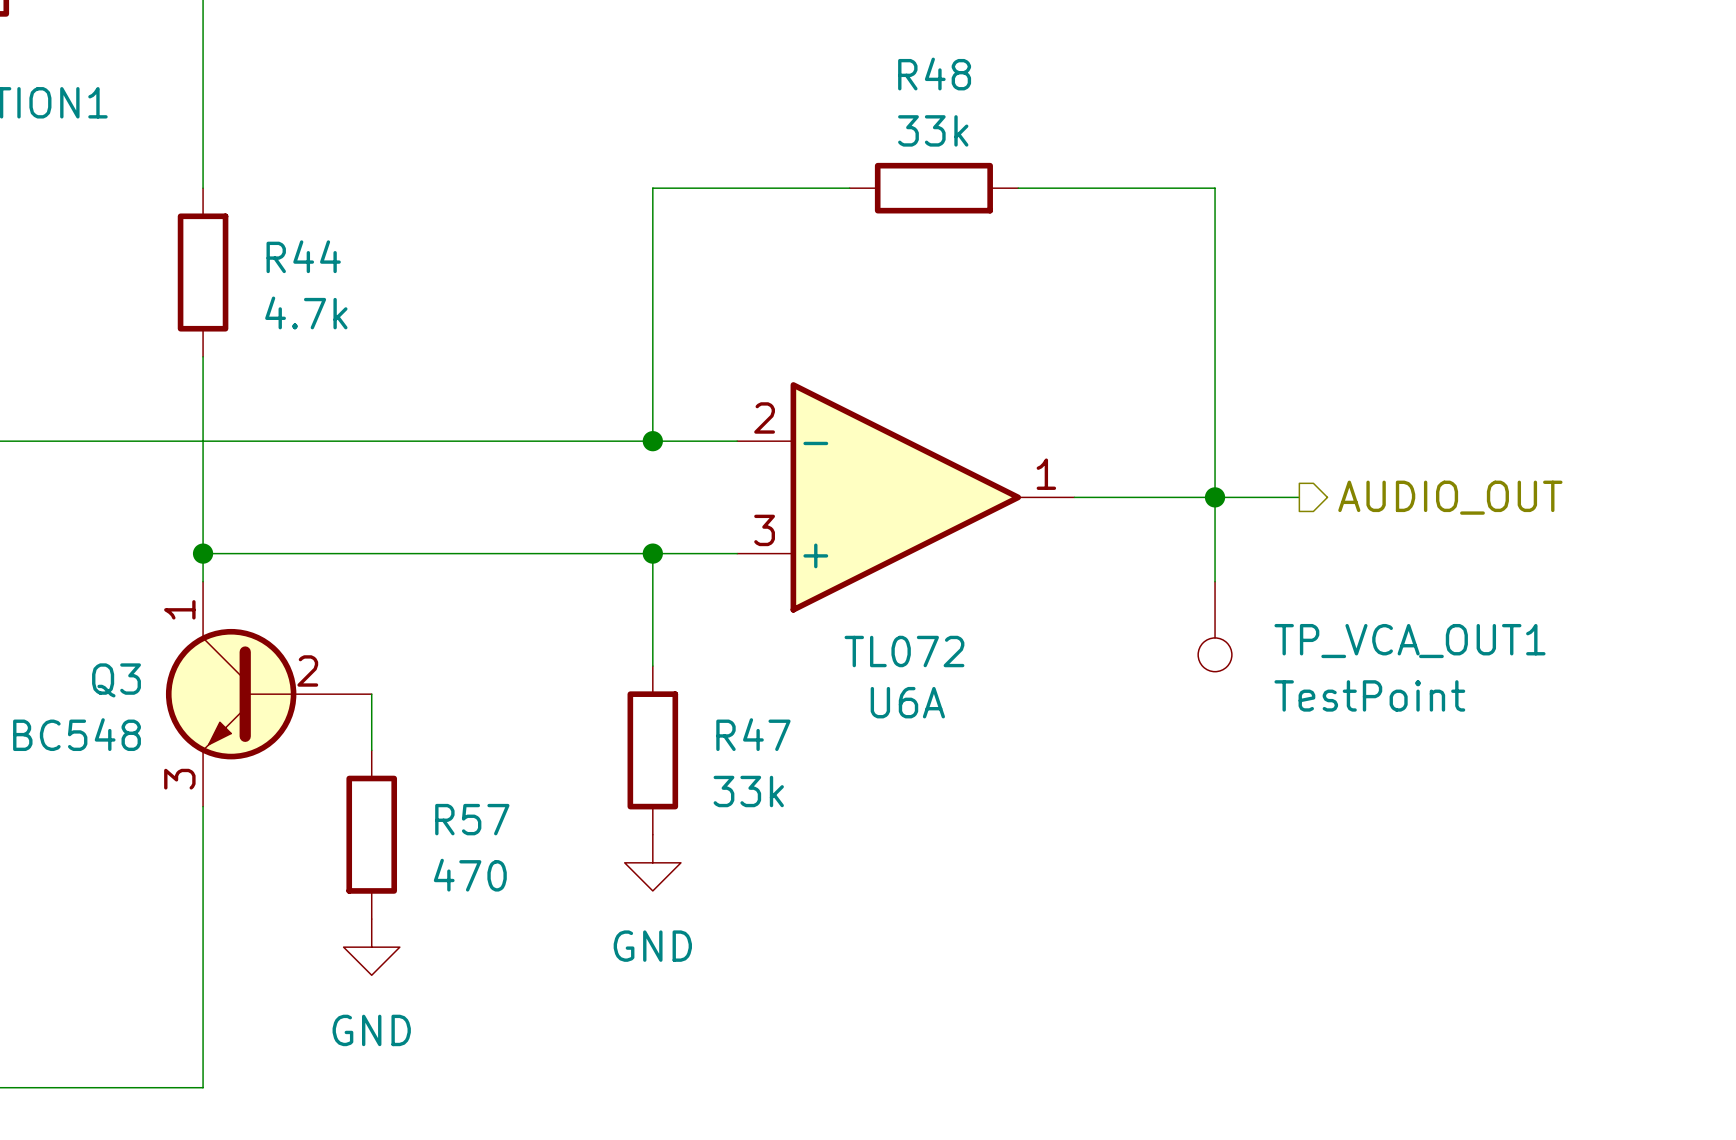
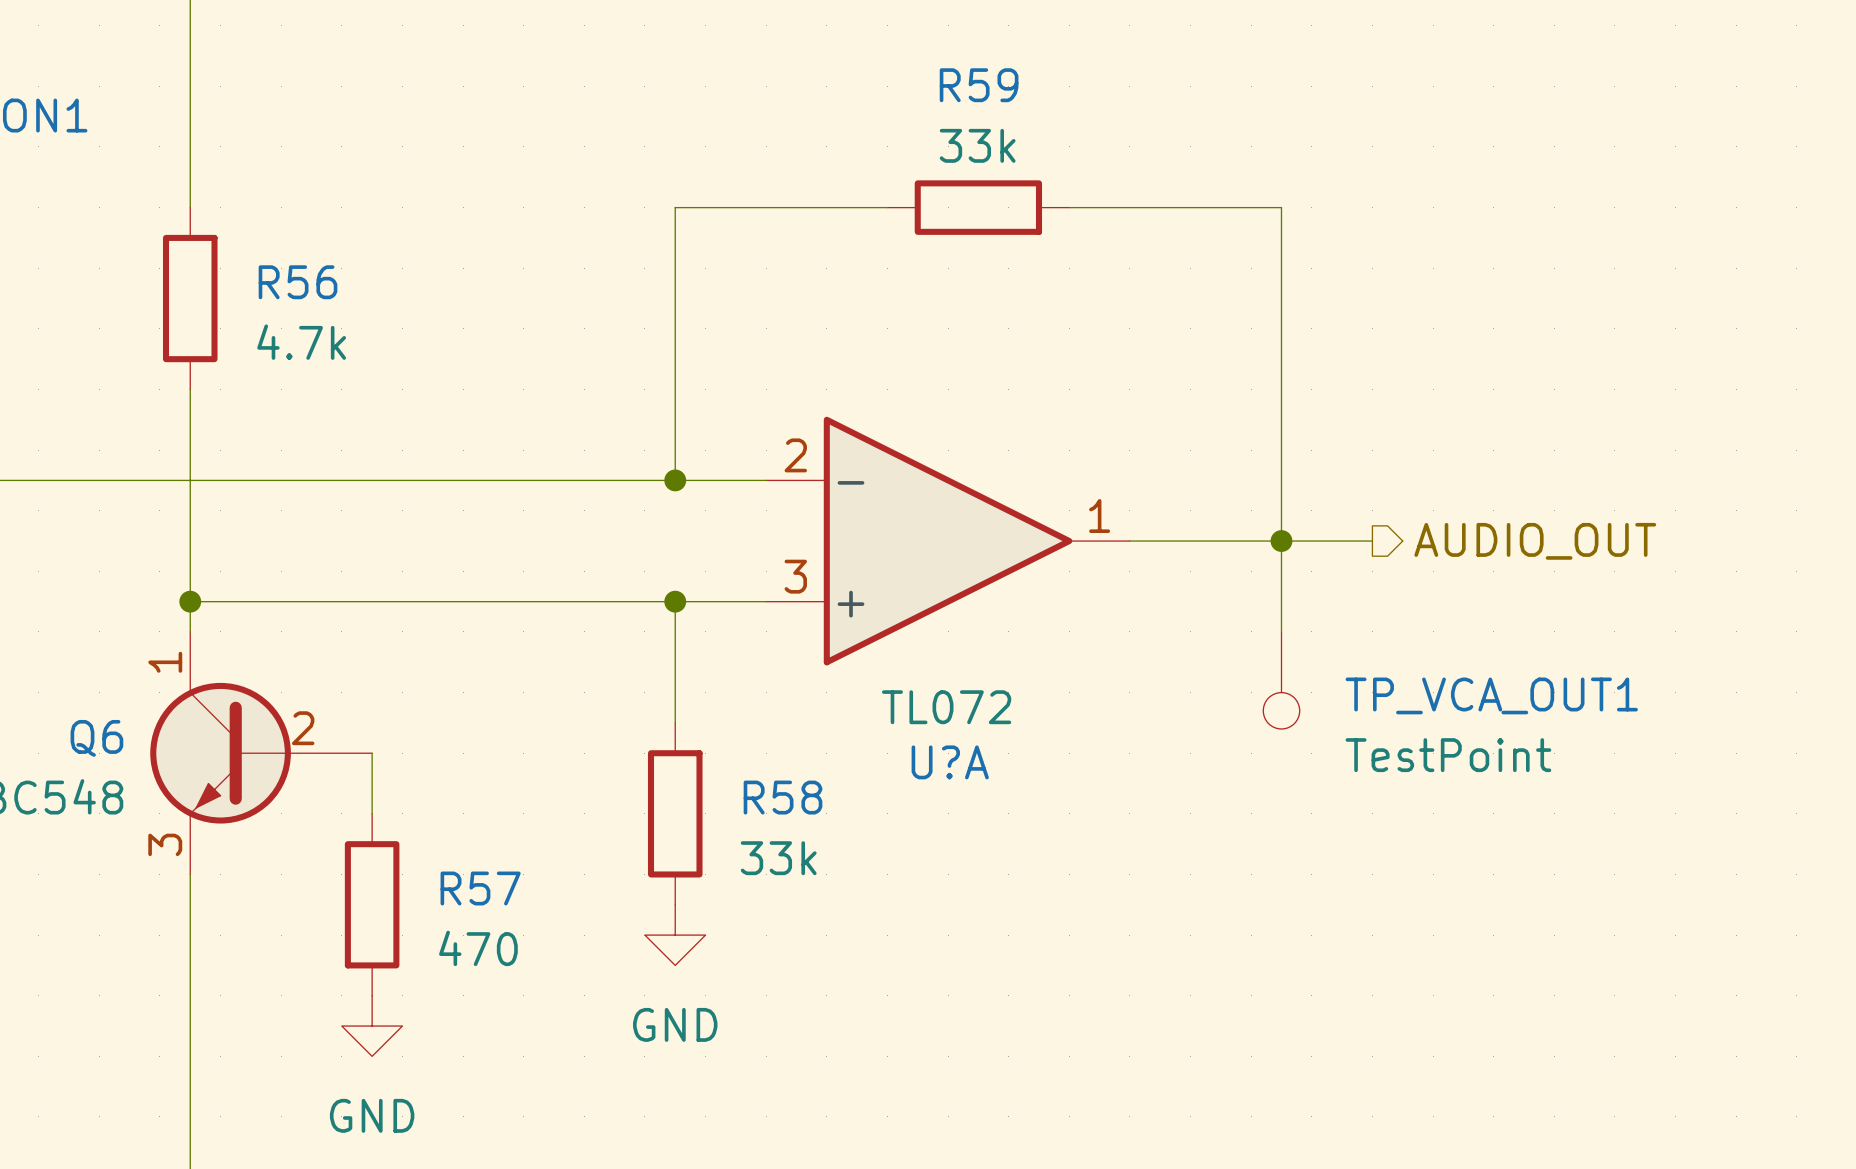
R48 name: R48 (934, 74) -> R59 (979, 85)
R44 name: R44 (303, 256) -> R56 (298, 282)
Q3 name: Q3 (116, 680) -> Q6 (96, 738)
U6A name: U6A (907, 702) -> U?A (950, 762)
R47 name: R47 (753, 734) -> R58 (783, 797)

